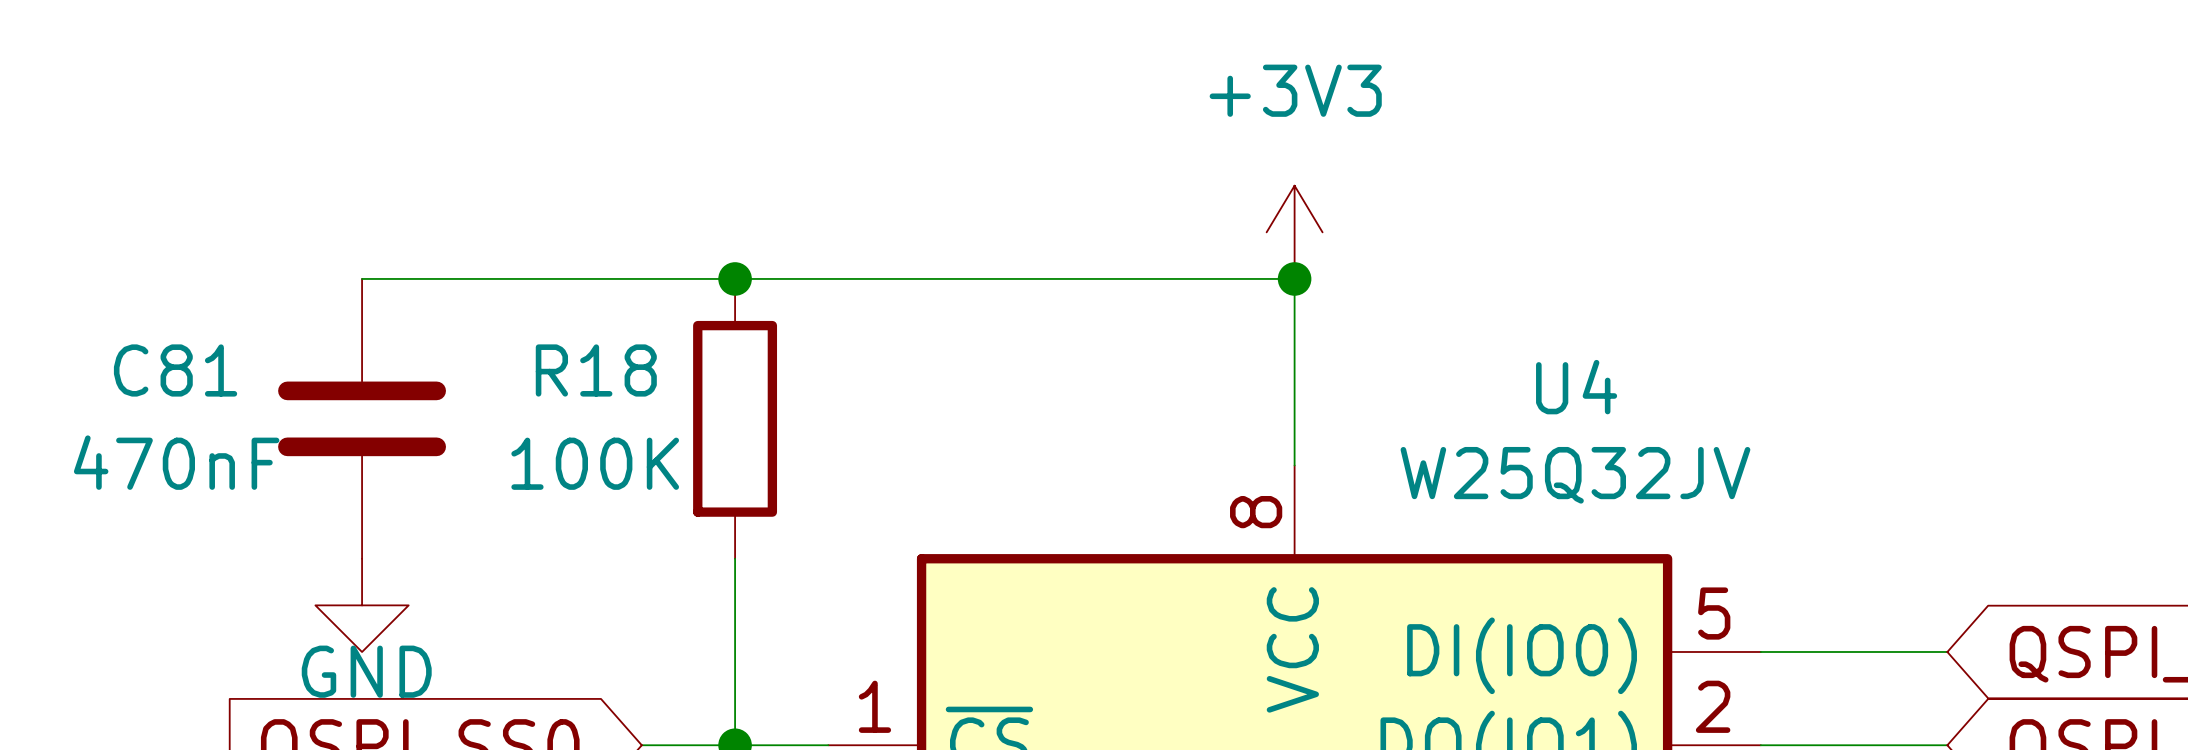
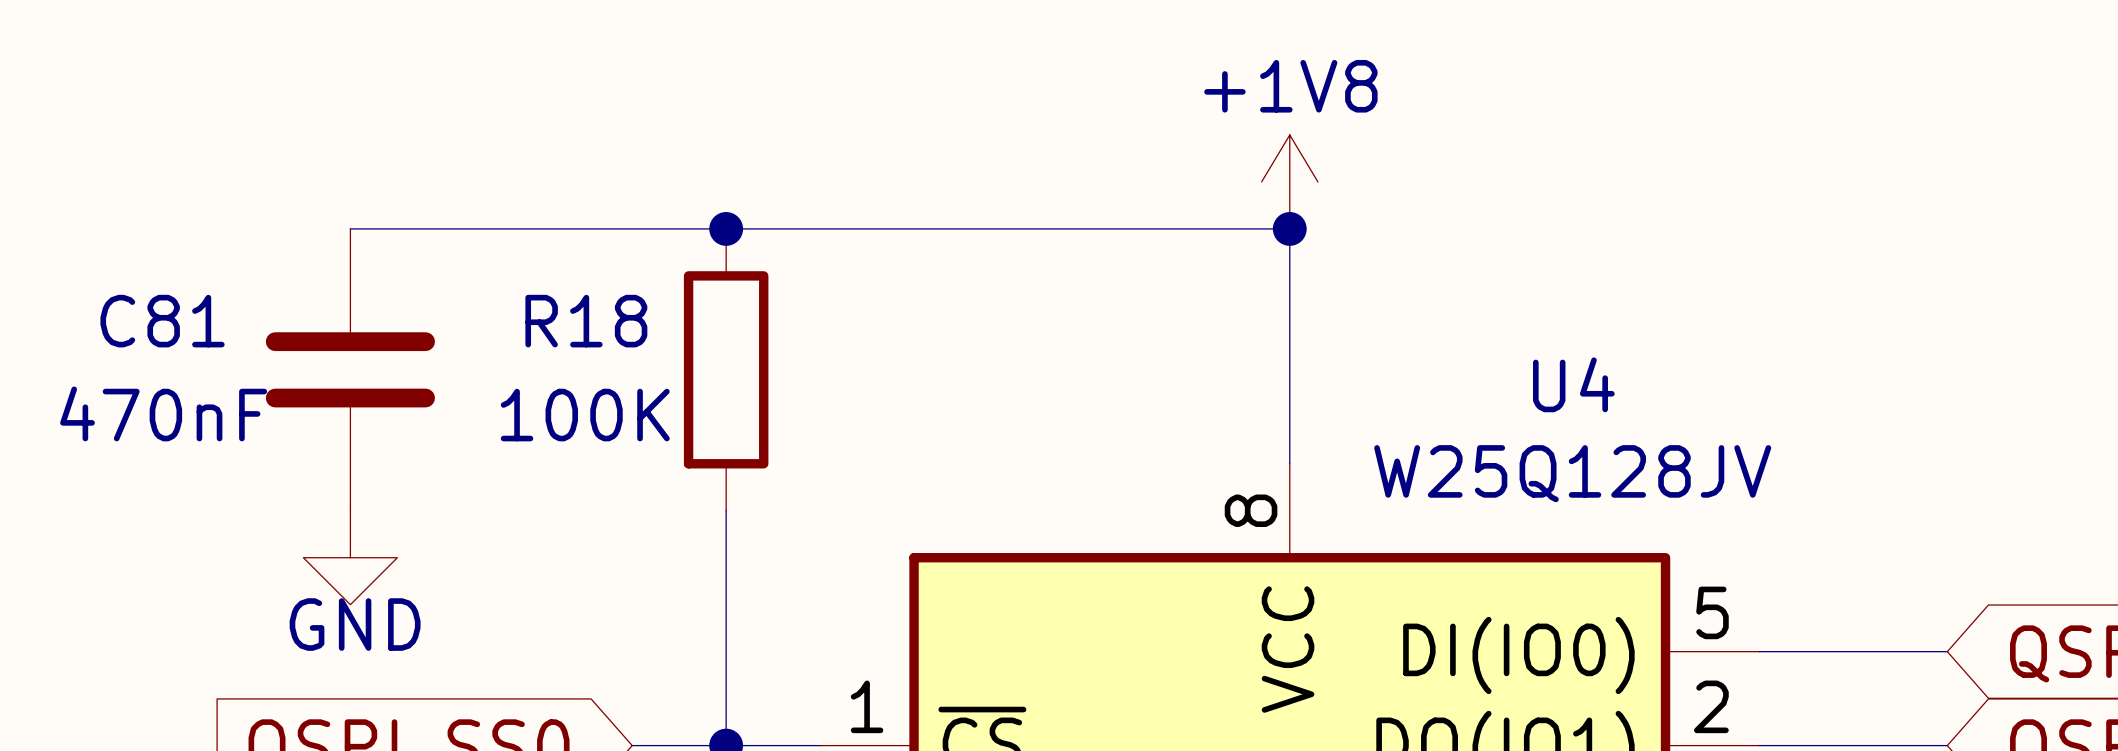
power symbol: none -> +1V8 (1289, 181)
power symbol: +3V3 (1294, 232) -> none
wire: (362, 278) (1294, 278) -> (350, 228) (1289, 228) (1289, 275)
junction position: (735, 278) -> (726, 228)
junction position: (1294, 278) -> (1289, 228)
C81 position: (362, 418) -> (350, 369)
R18 position: (735, 418) -> (726, 369)
U4 value: W25Q32JV (1575, 475) -> W25Q128JV (1572, 473)
power symbol position: GND (362, 605) -> GND (350, 557)

